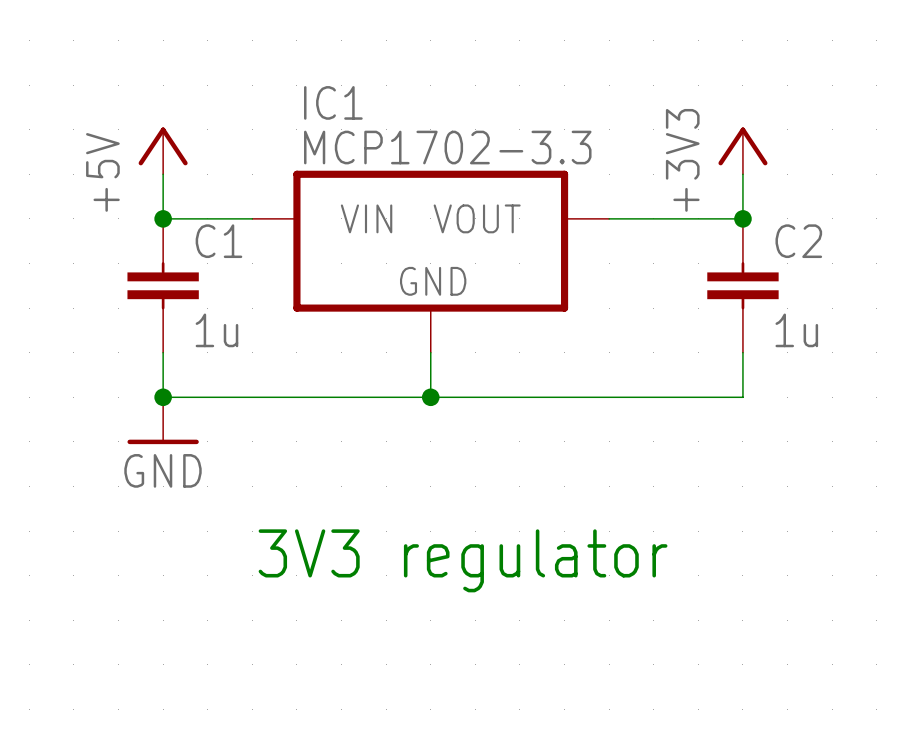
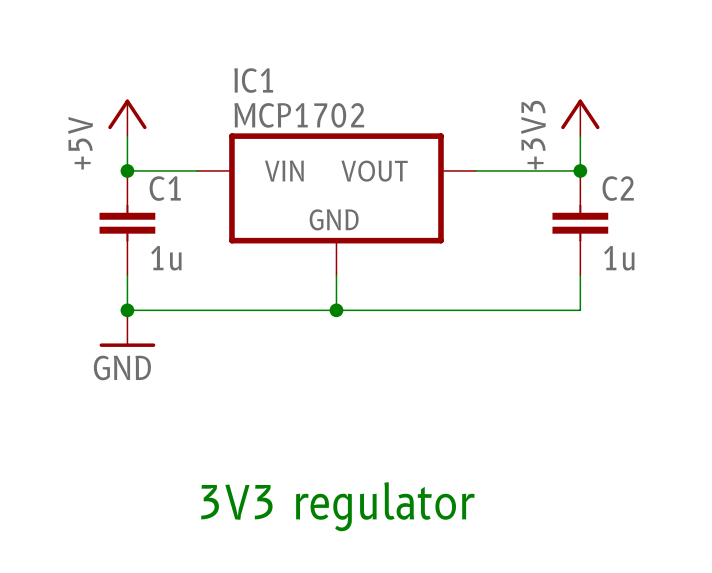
IC1 value: MCP1702-3.3 (447, 147) -> MCP1702 (299, 115)
text position: 3V3 regulator (463, 560) -> 3V3 regulator (337, 506)

